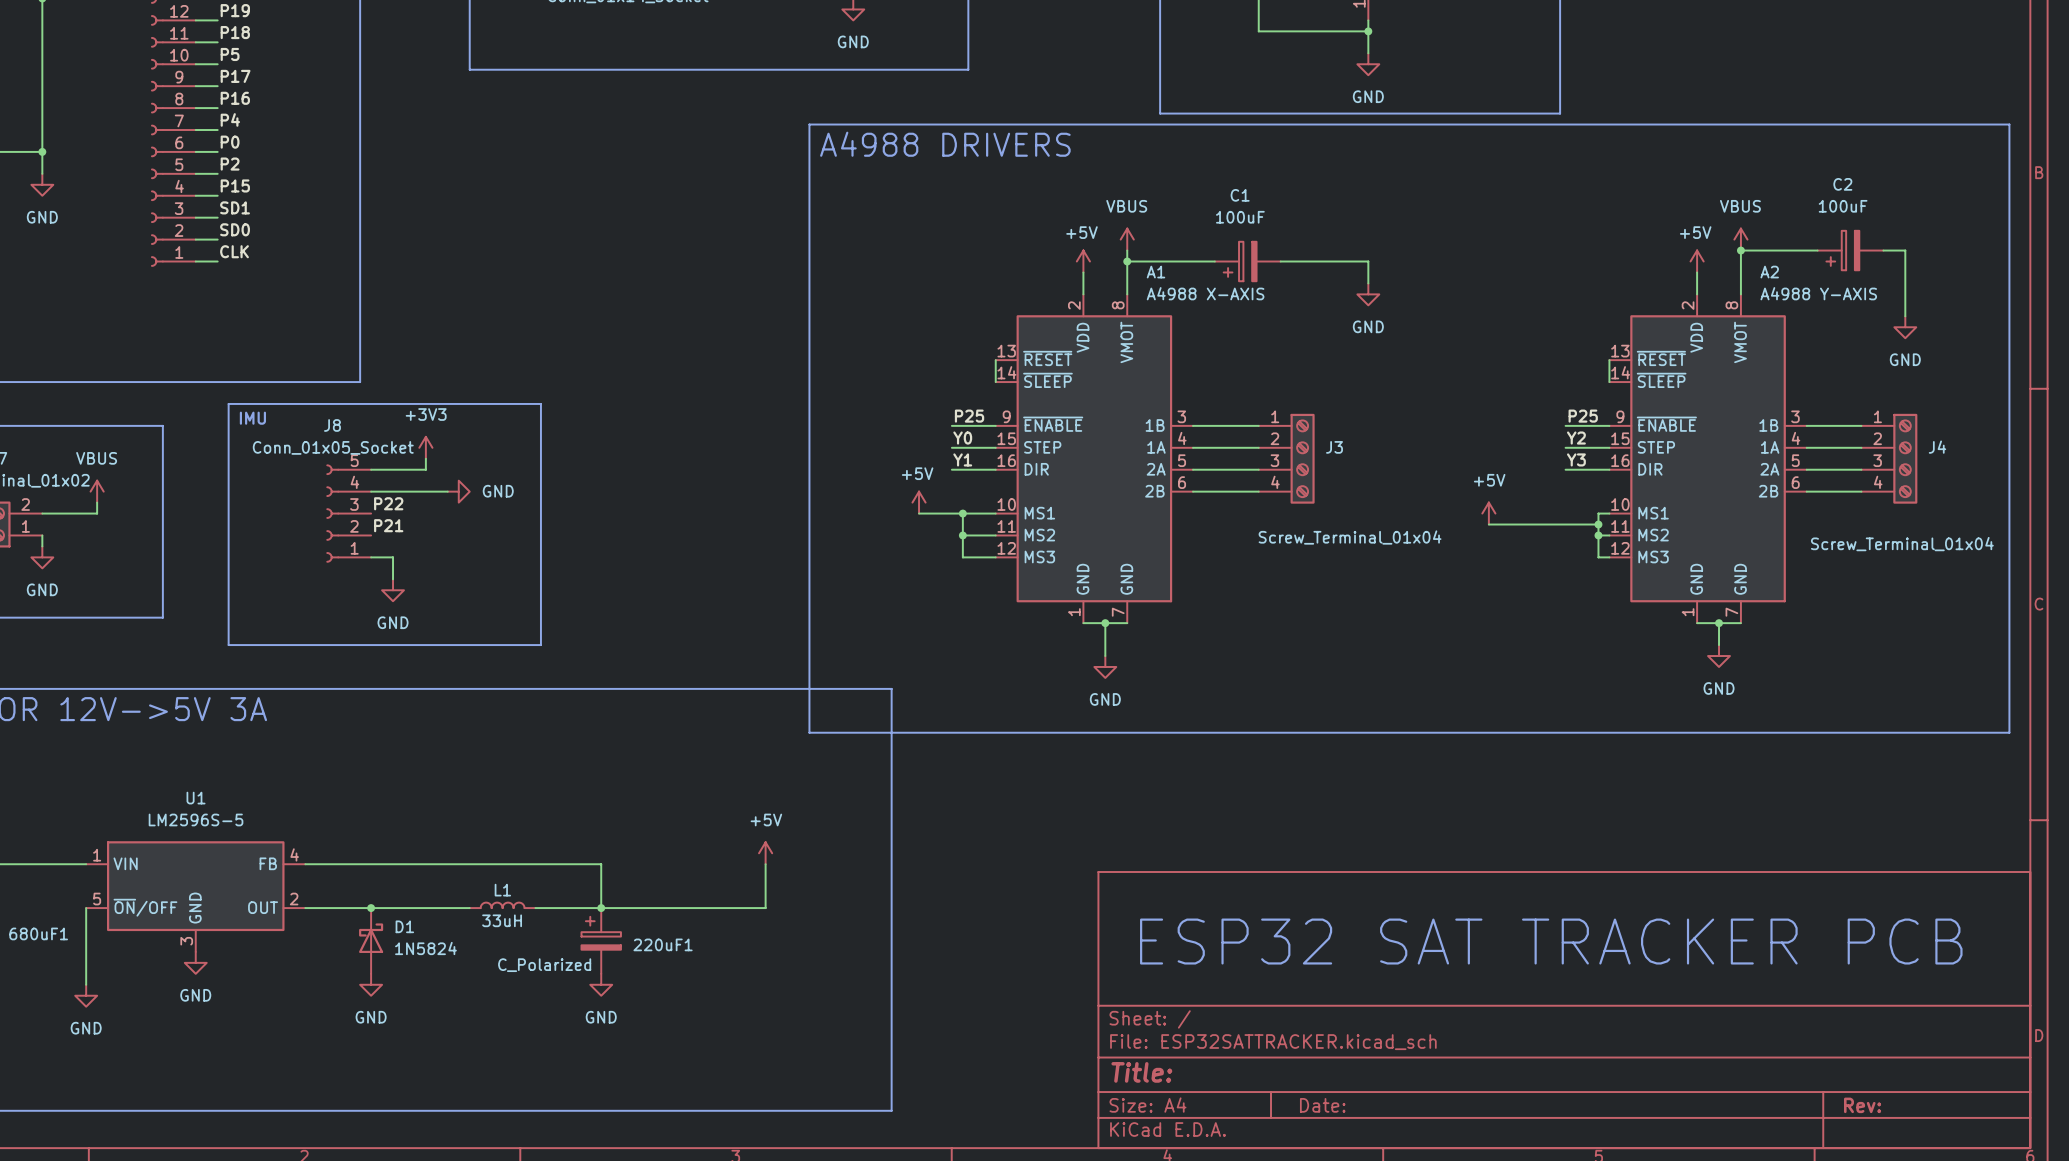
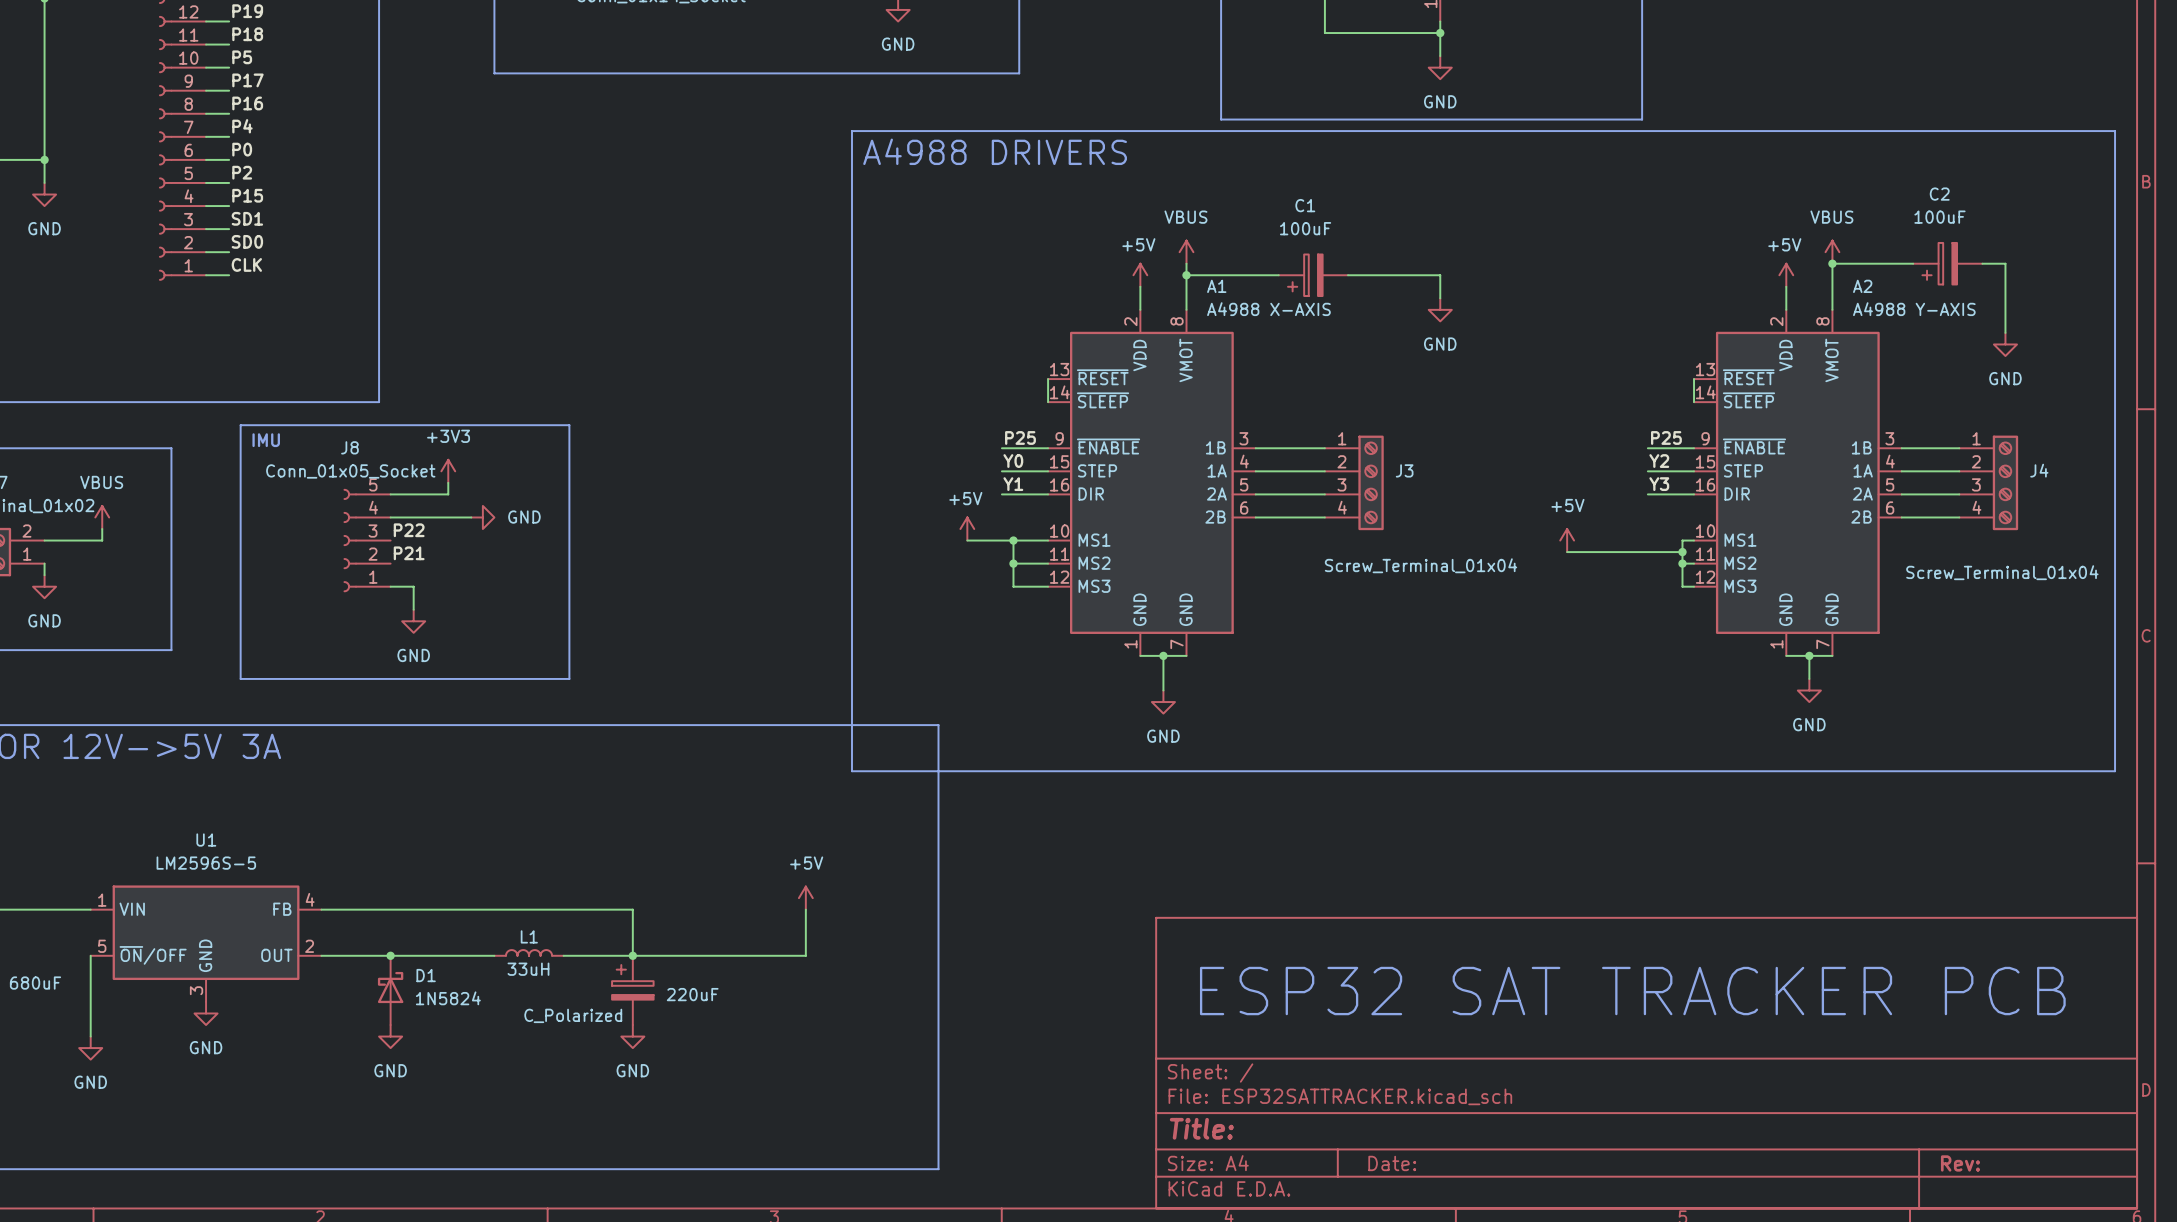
680uF1 name: 680uF1 (38, 933) -> 680uF (35, 983)
220uF1 name: 220uF1 (663, 944) -> 220uF (692, 994)

